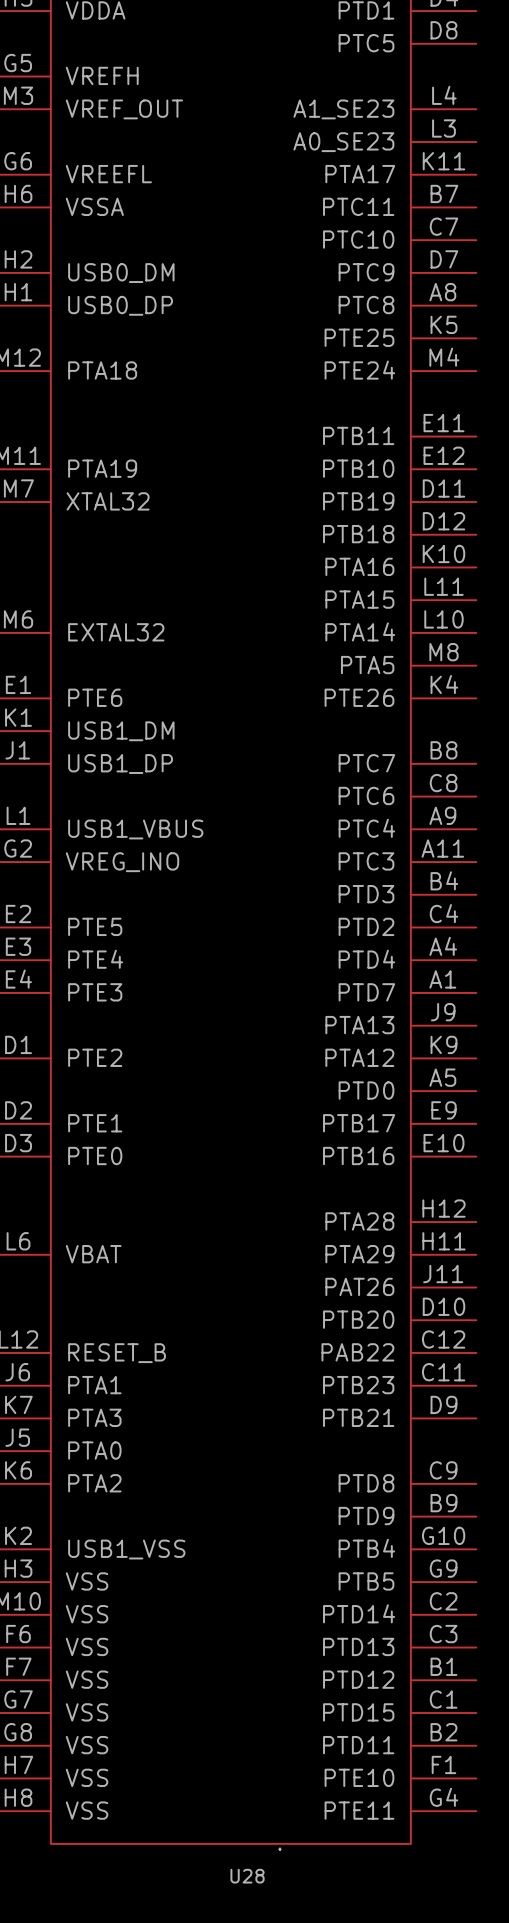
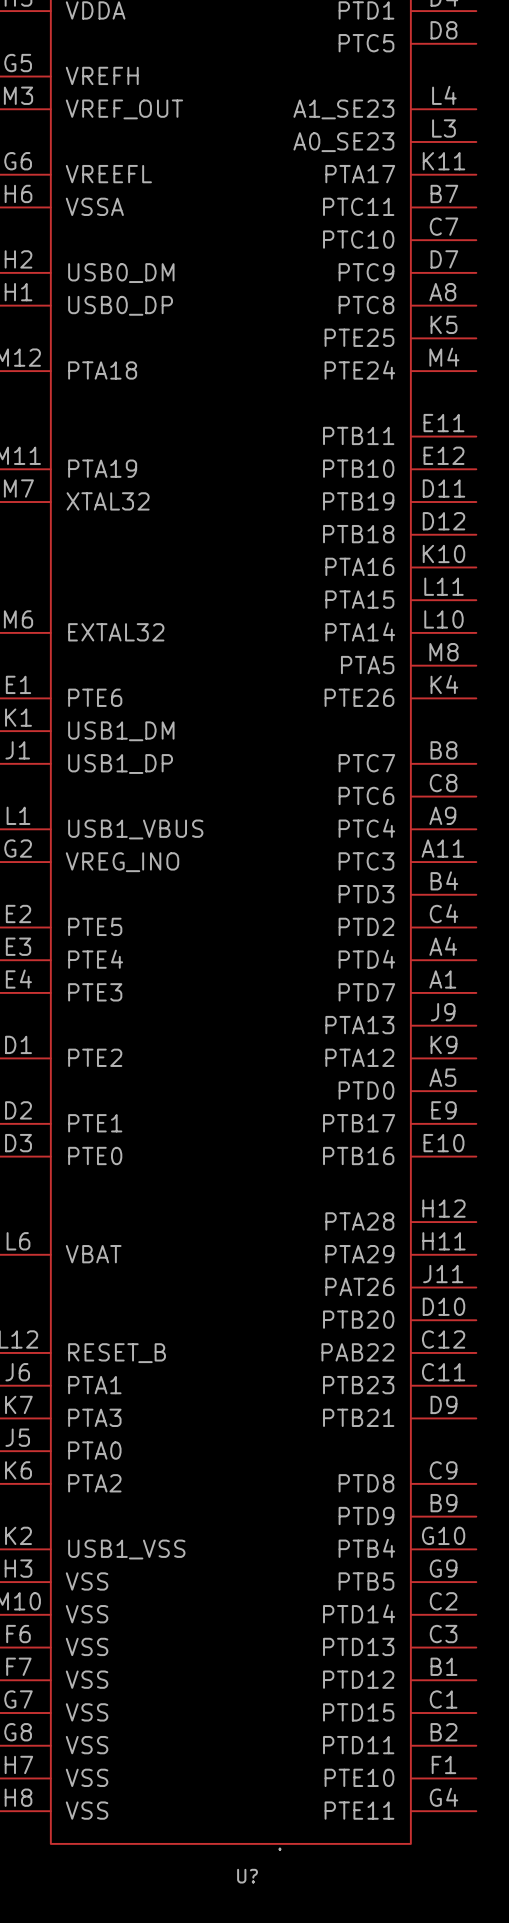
U28 name: U28 (247, 1876) -> U? (247, 1876)

